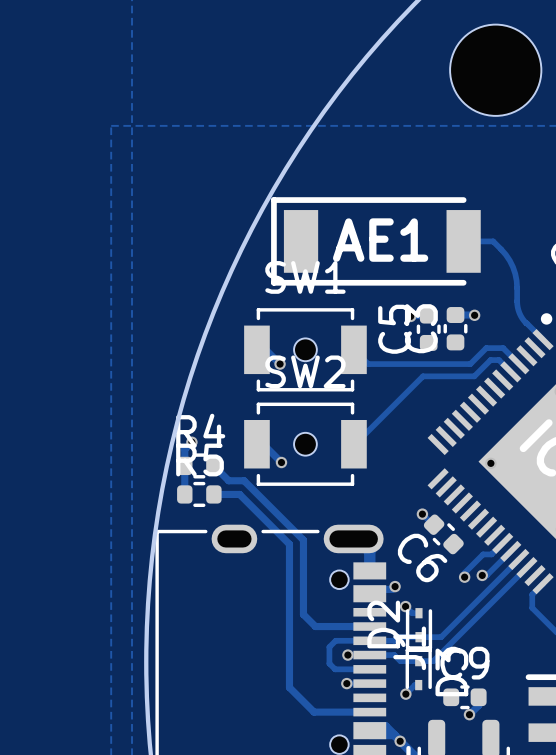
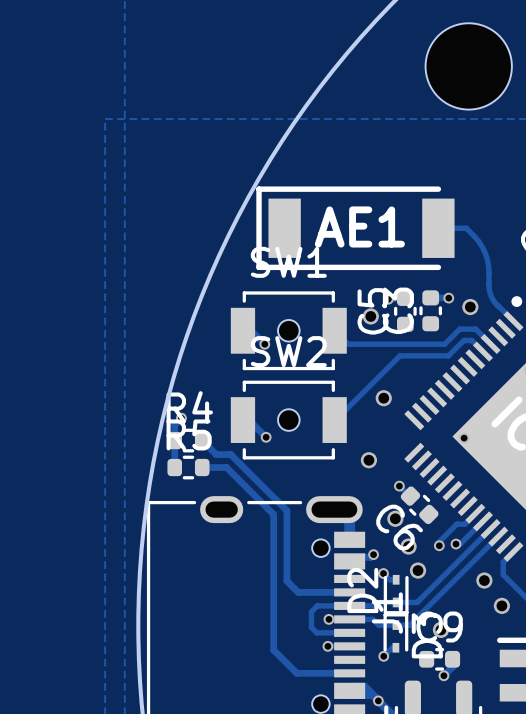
via: none -> (470, 307)
via: none -> (370, 316)
via: none -> (383, 398)
via: none -> (368, 460)
via: none -> (395, 518)
via: none -> (408, 546)
via: none -> (418, 570)
via: none -> (484, 580)
via: none -> (501, 605)
via: none -> (440, 629)

